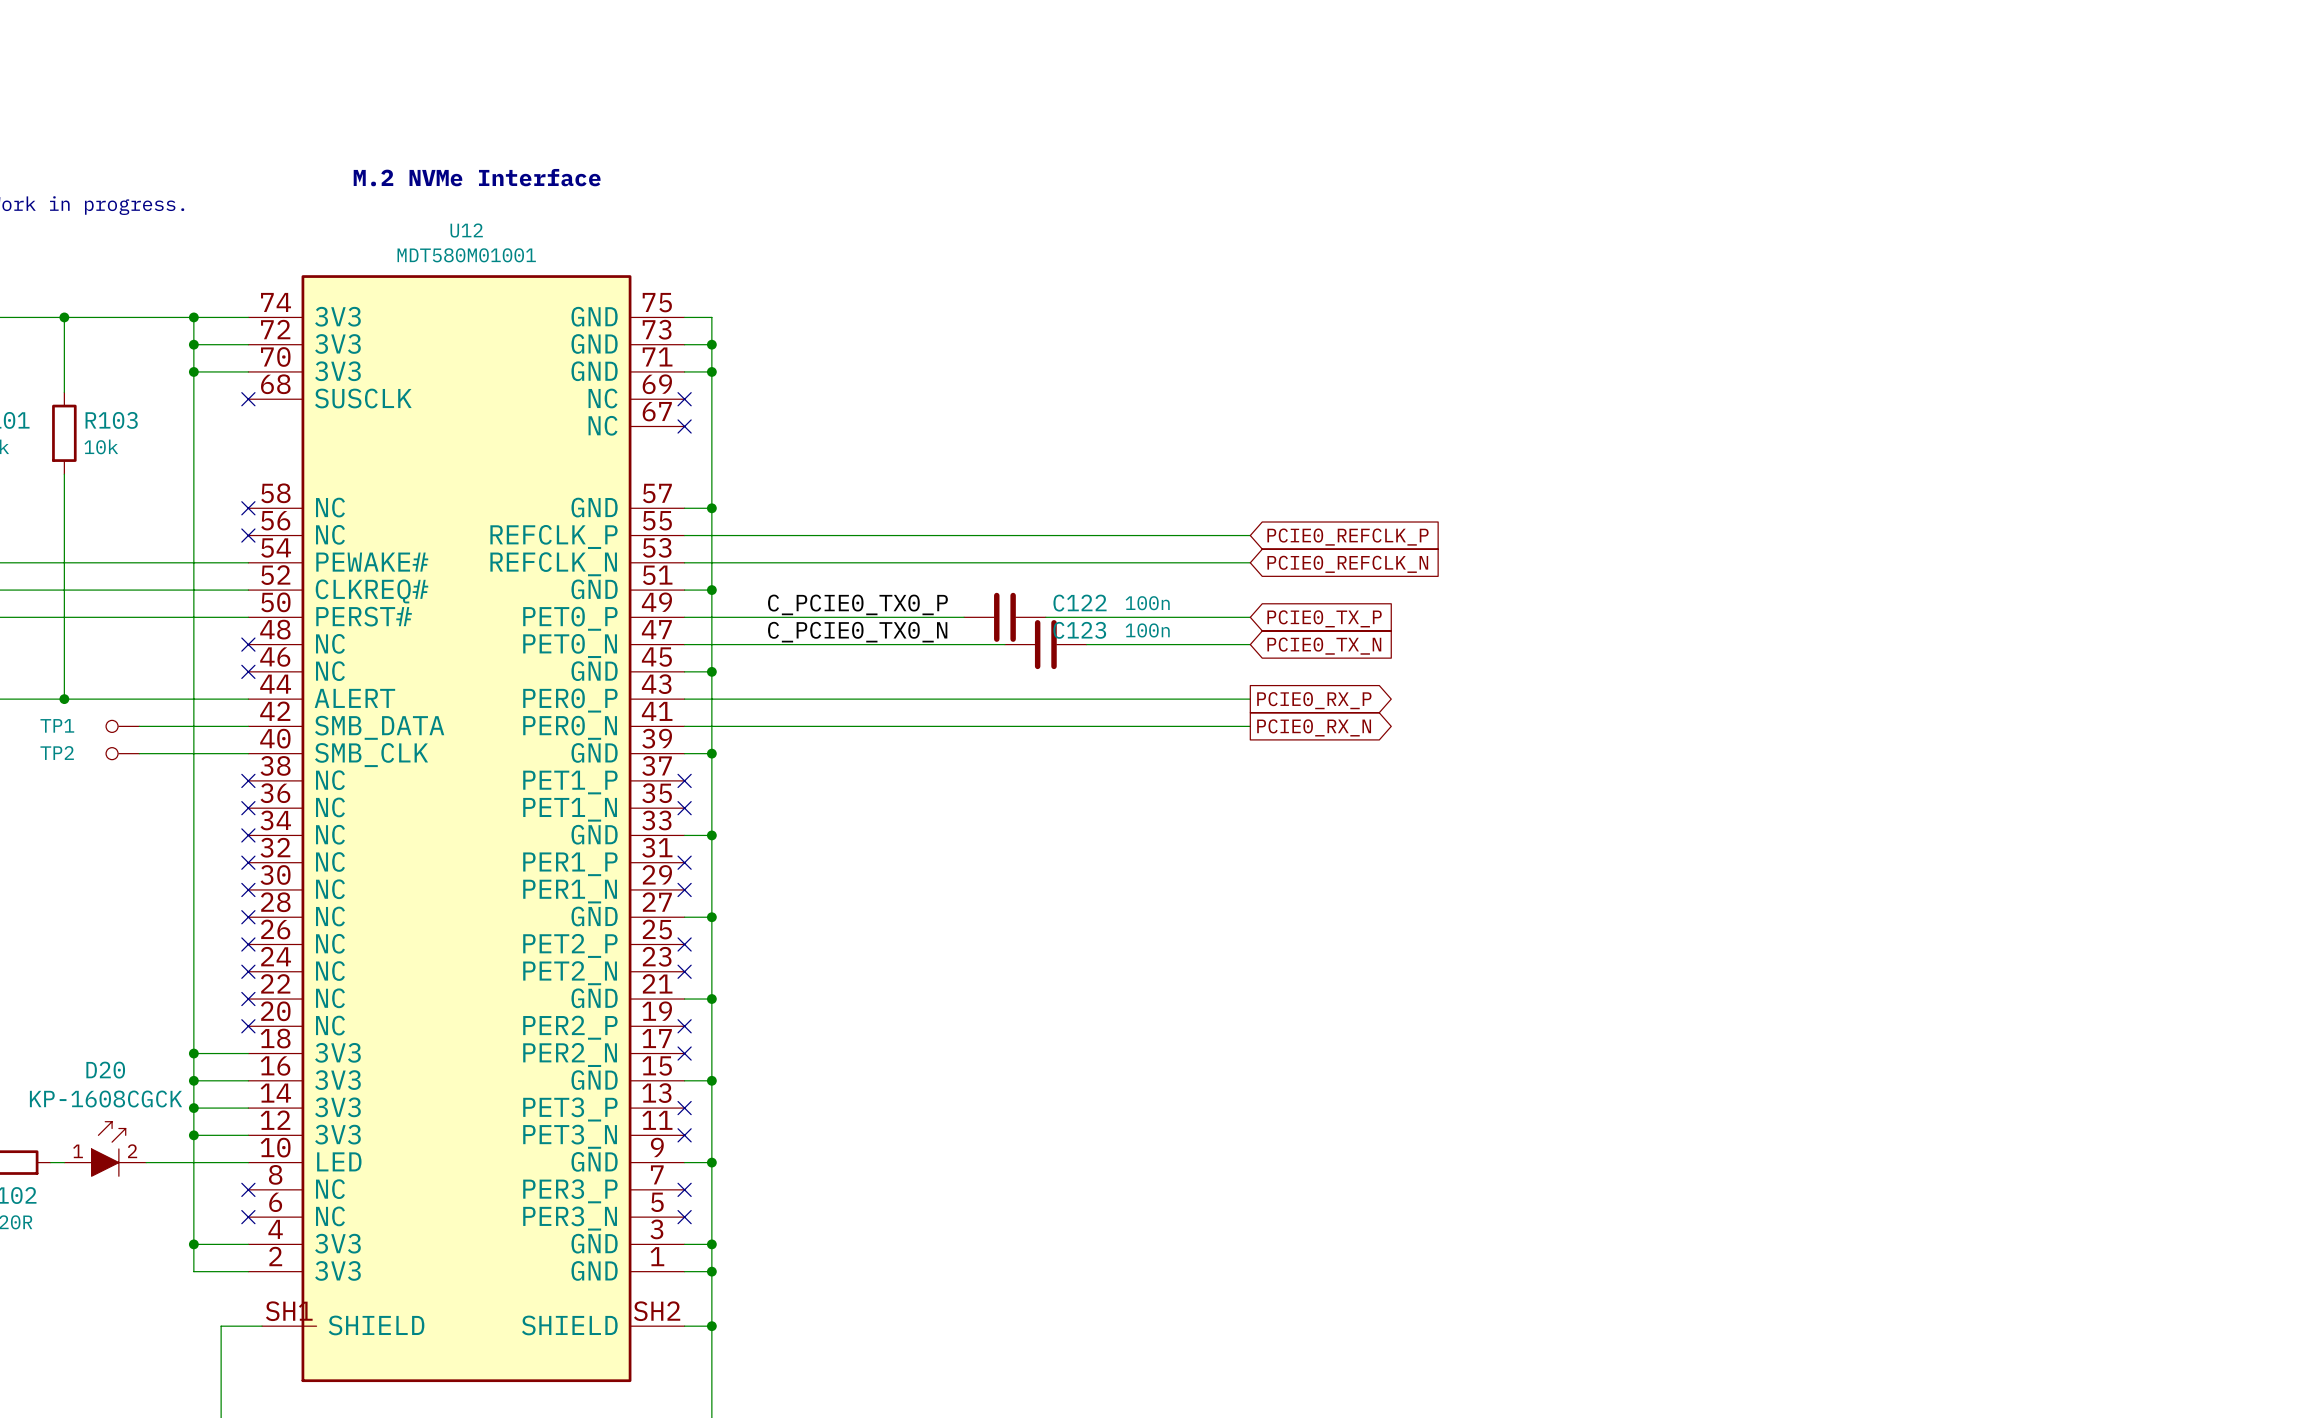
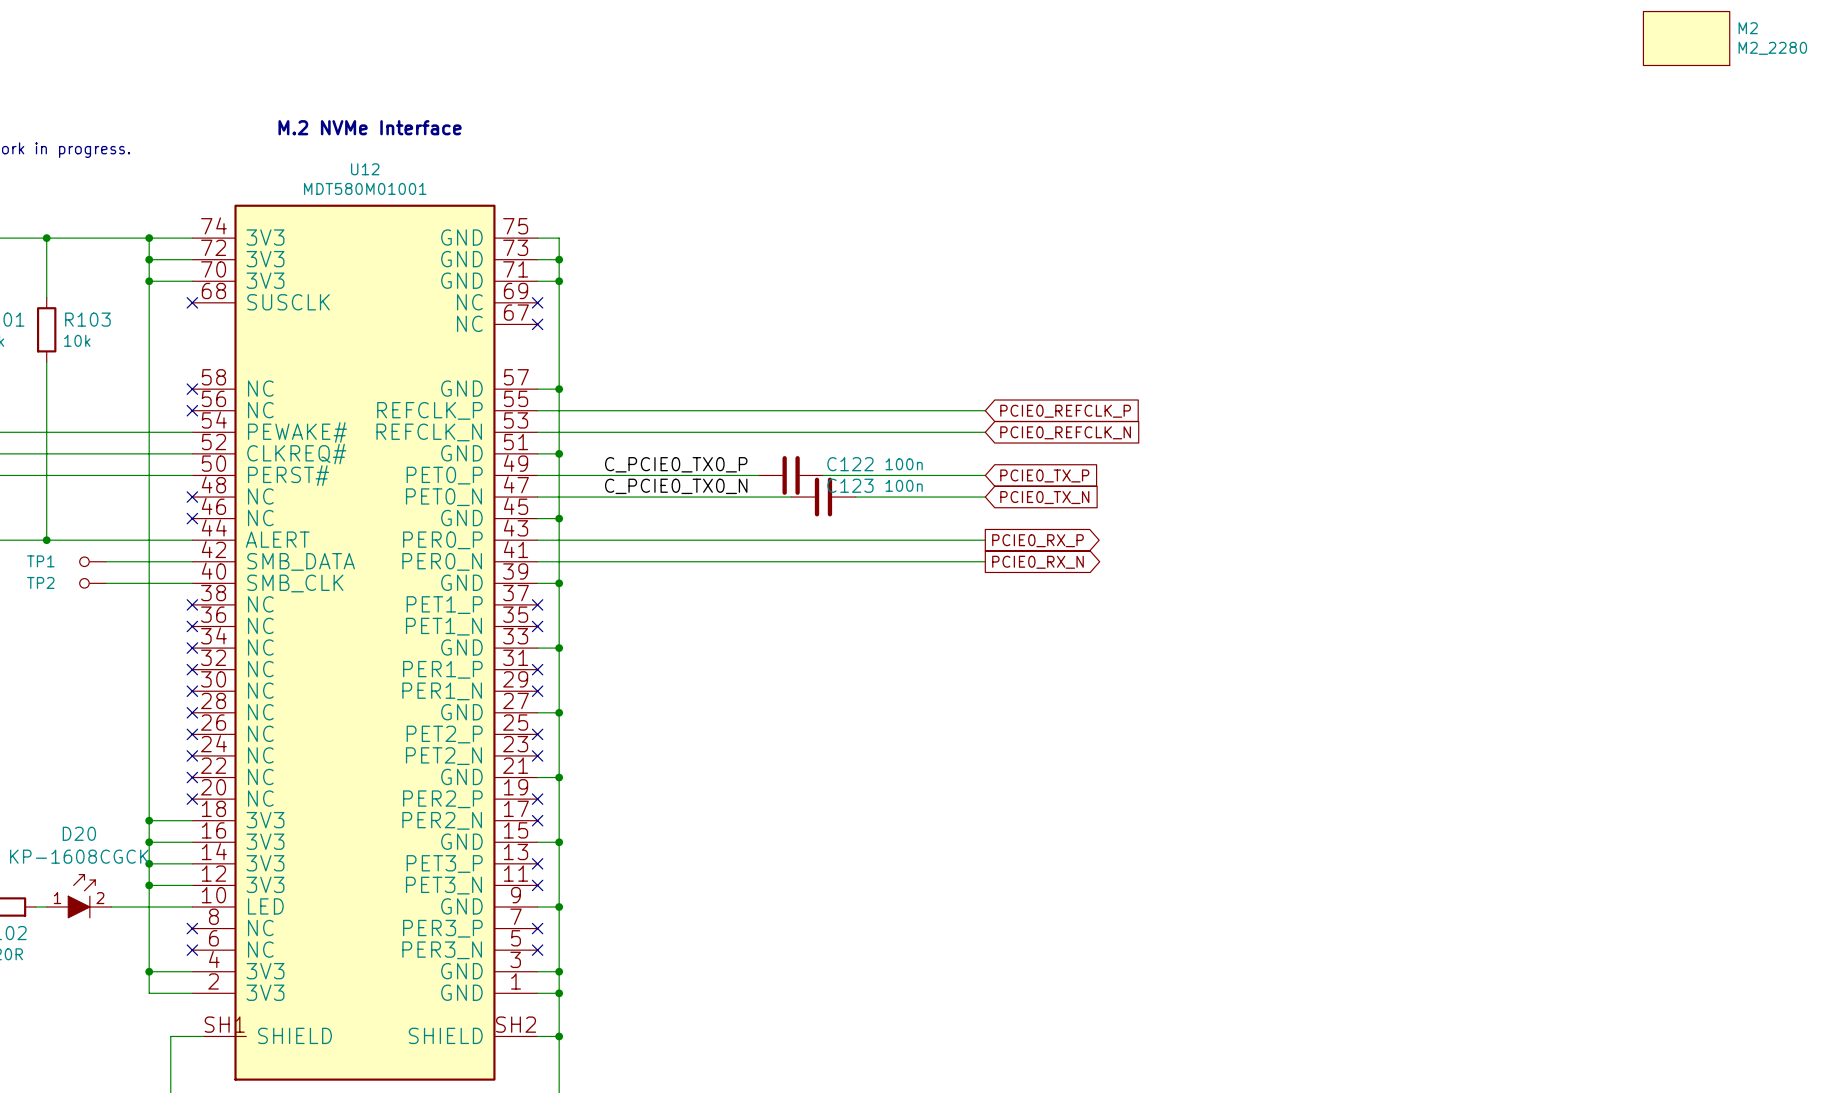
M2: none -> M2_2280 (1686, 38)

